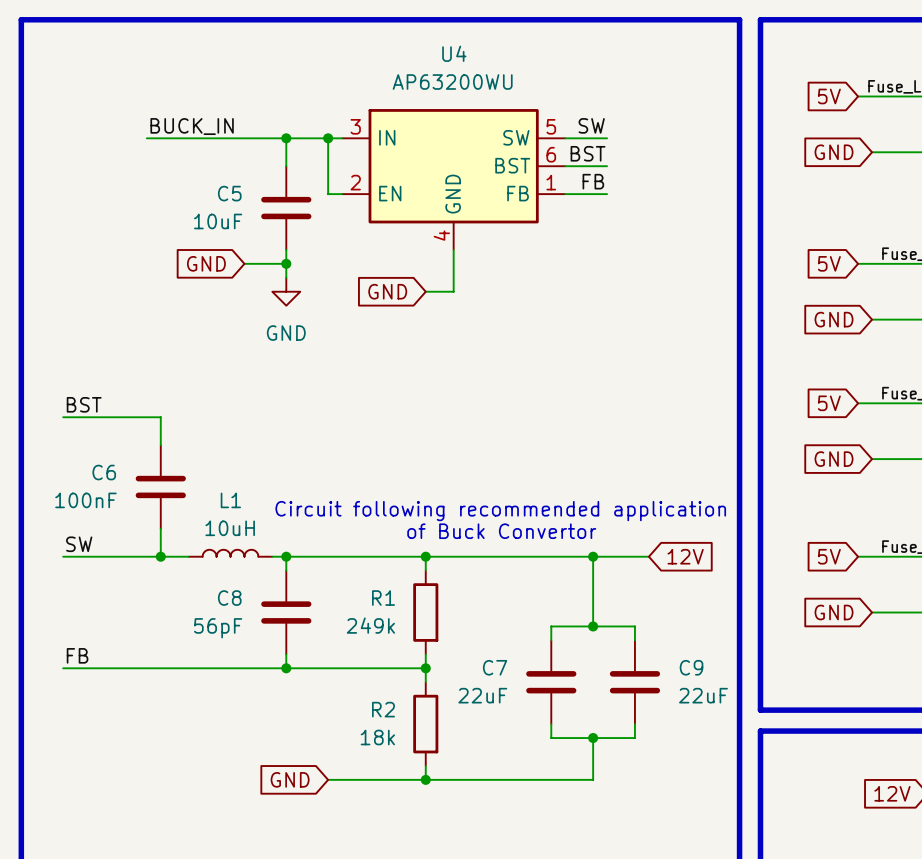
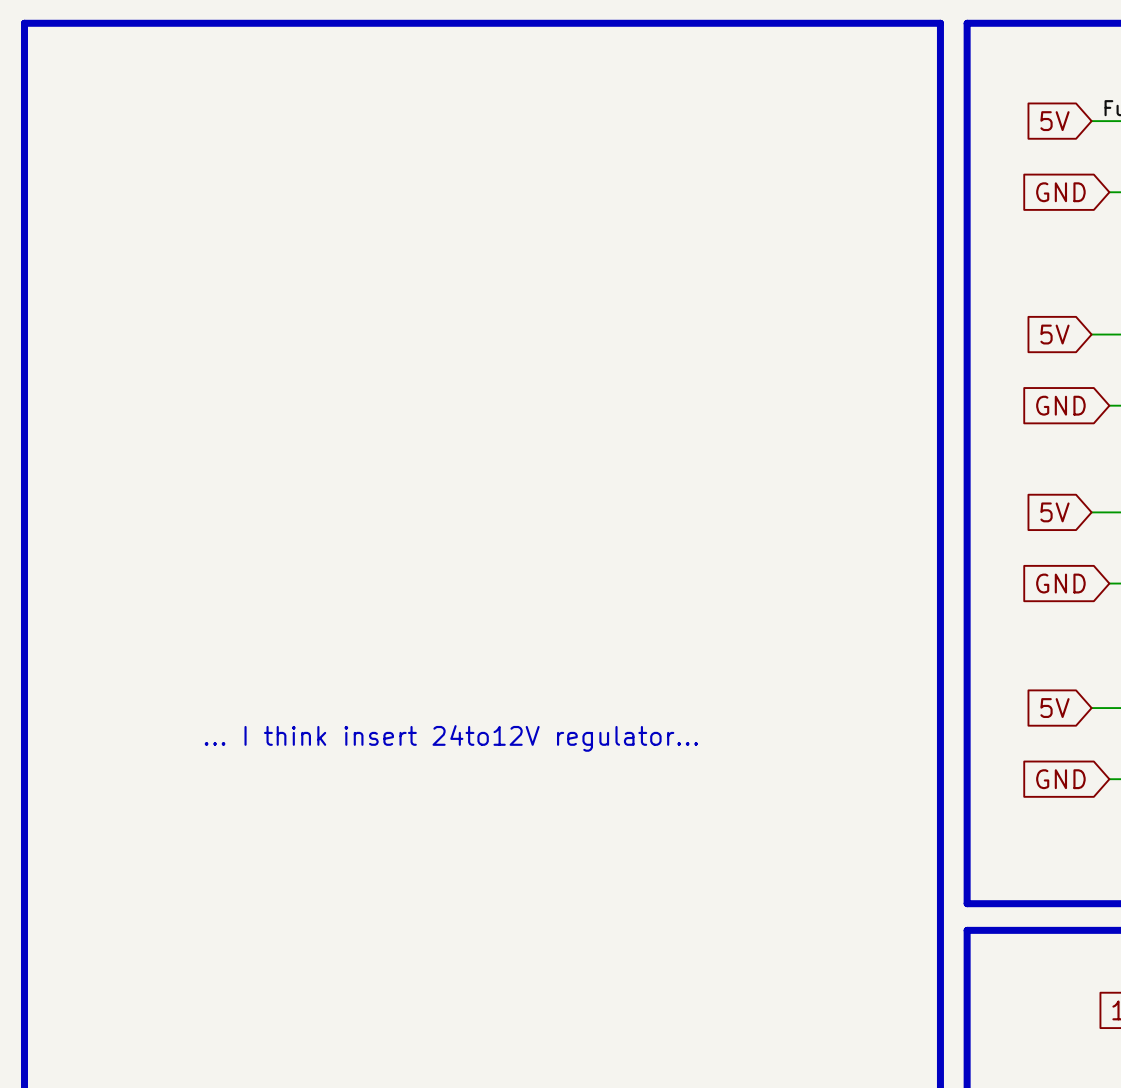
label: SW (591, 125) -> none
label: BUCK_IN (192, 126) -> none
wire: (146, 138) (342, 138) -> none
wire: (286, 138) (286, 166) -> none
junction: (286, 138) -> none
wire: (328, 138) (328, 194) (342, 194) -> none
junction: (328, 138) -> none
wire: (565, 138) (607, 138) -> none
label: BST (588, 153) -> none
wire: (565, 166) (607, 166) -> none
U4: AP63200WU (453, 179) -> none
label: FB (593, 181) -> none
wire: (565, 194) (607, 194) -> none
C5: 10uF (286, 208) -> none
wire: (286, 249) (286, 277) -> none
wire: (453, 249) (453, 291) (425, 291) -> none
global label: GND (206, 263) -> none
wire: (244, 263) (286, 263) -> none
junction: (286, 263) -> none
power symbol: GND (286, 291) -> none
global label: GND (387, 291) -> none
label: BST (84, 404) -> none
wire: (63, 417) (160, 417) (160, 445) -> none
C6: 100nF (160, 486) -> none
text: Circuit following recommended application (500, 511) -> none
wire: (160, 528) (160, 556) -> none
text: of Buck Convertor (501, 531) -> none
label: SW (79, 544) -> none
L1: 10uH (230, 553) -> none
wire: (63, 556) (188, 556) -> none
junction: (160, 556) -> none
wire: (272, 556) (648, 556) -> none
wire: (286, 556) (286, 570) -> none
junction: (286, 556) -> none
wire: (425, 556) (425, 570) -> none
junction: (425, 556) -> none
wire: (593, 556) (593, 626) -> none
junction: (593, 556) -> none
global label: 12V (685, 556) -> none
text: none -> ... I think insert 24to12V regulator... (451, 738)
C8: 56pF (286, 612) -> none
R1: 249k (425, 612) -> none
junction: (593, 626) -> none
wire: (551, 640) (551, 626) (634, 626) (634, 640) -> none
wire: (286, 654) (286, 668) -> none
wire: (425, 654) (425, 682) -> none
label: FB (77, 655) -> none
wire: (63, 668) (425, 668) -> none
junction: (286, 668) -> none
junction: (425, 668) -> none
C7: 22uF (551, 682) -> none
C9: 22uF (634, 682) -> none
R2: 18k (425, 724) -> none
wire: (551, 724) (551, 738) (634, 738) (634, 724) -> none
wire: (593, 738) (593, 779) (328, 779) -> none
junction: (593, 738) -> none
wire: (425, 765) (425, 779) -> none
global label: GND (290, 779) -> none
junction: (425, 779) -> none

